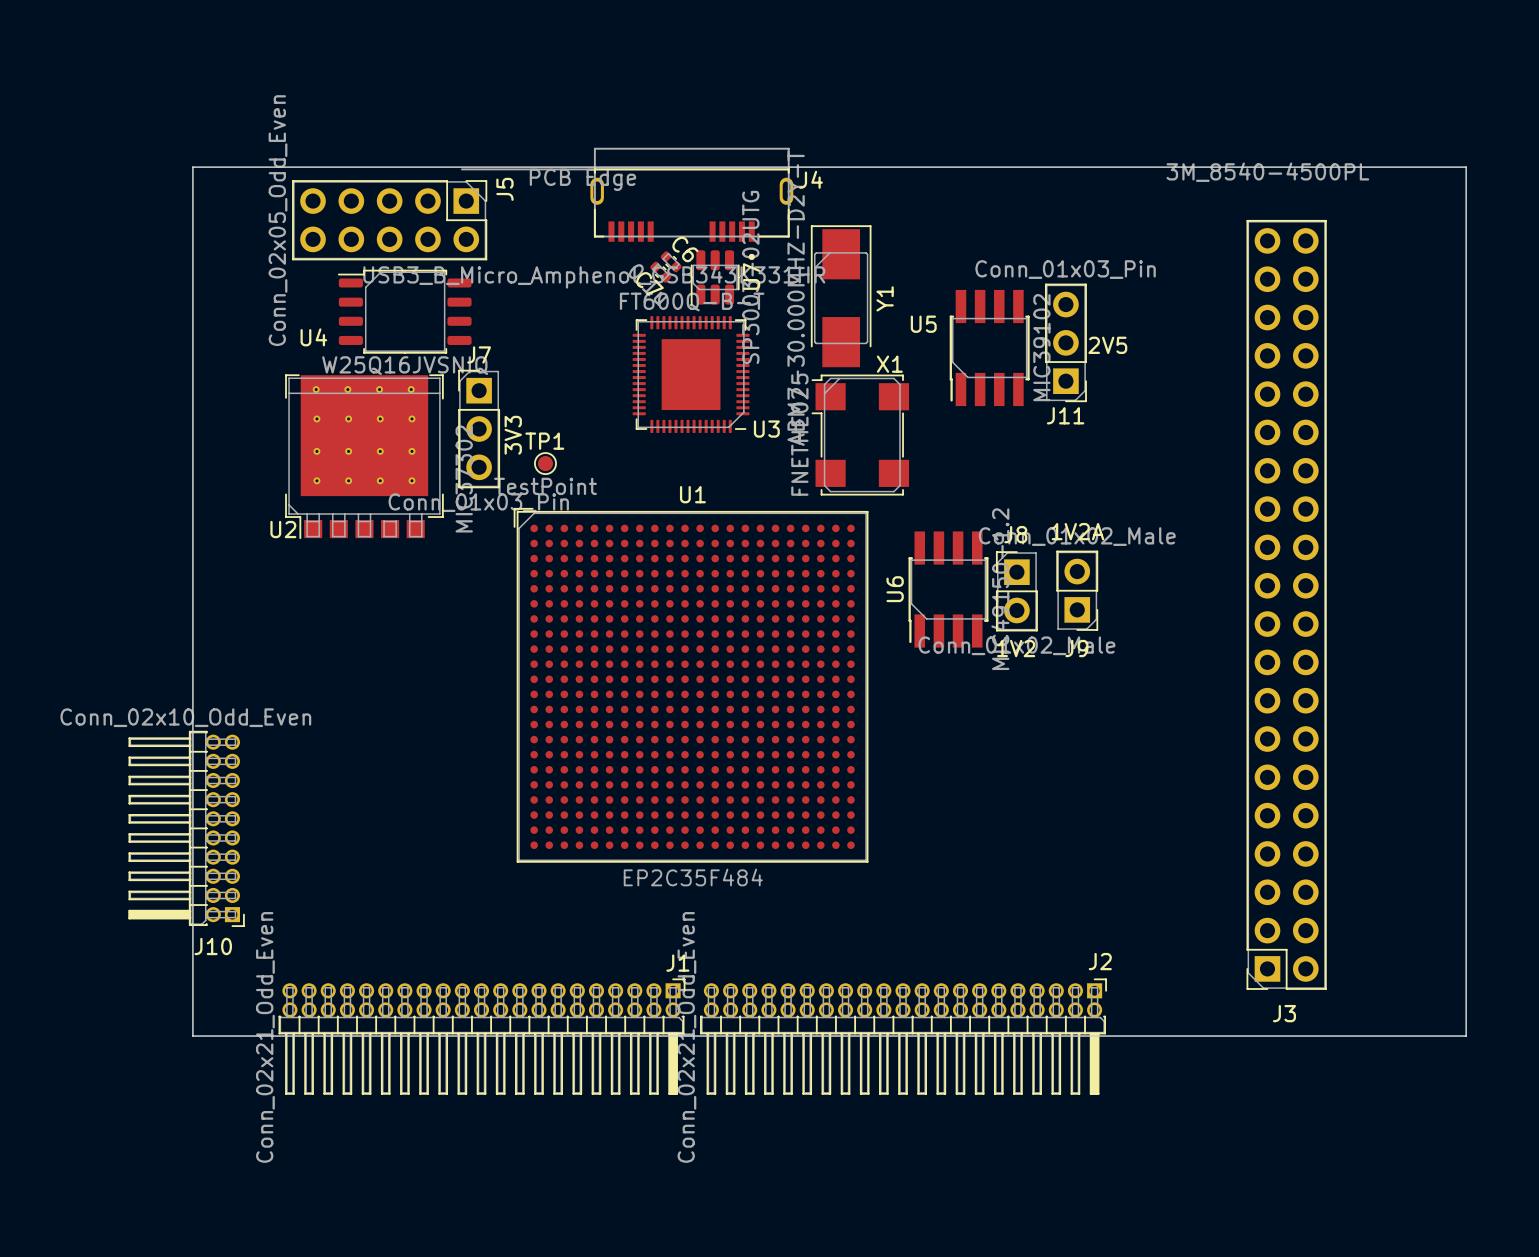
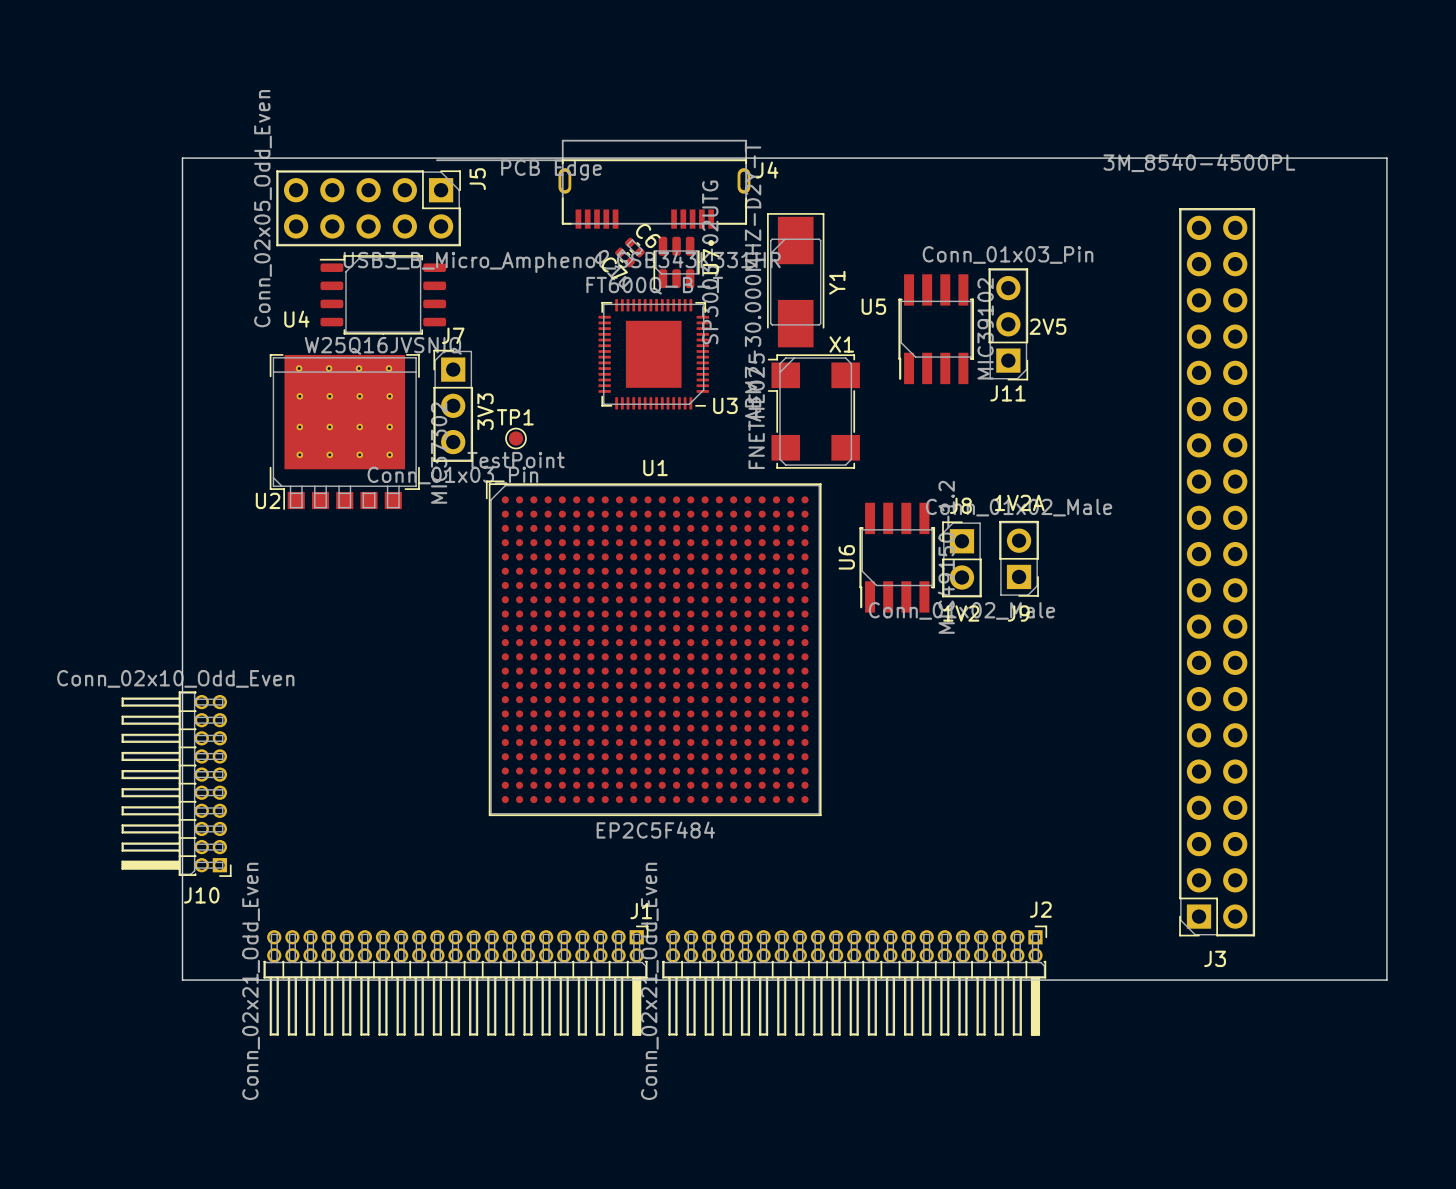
U1 value: EP2C35F484 (693, 877) -> EP2C5F484 (655, 830)

